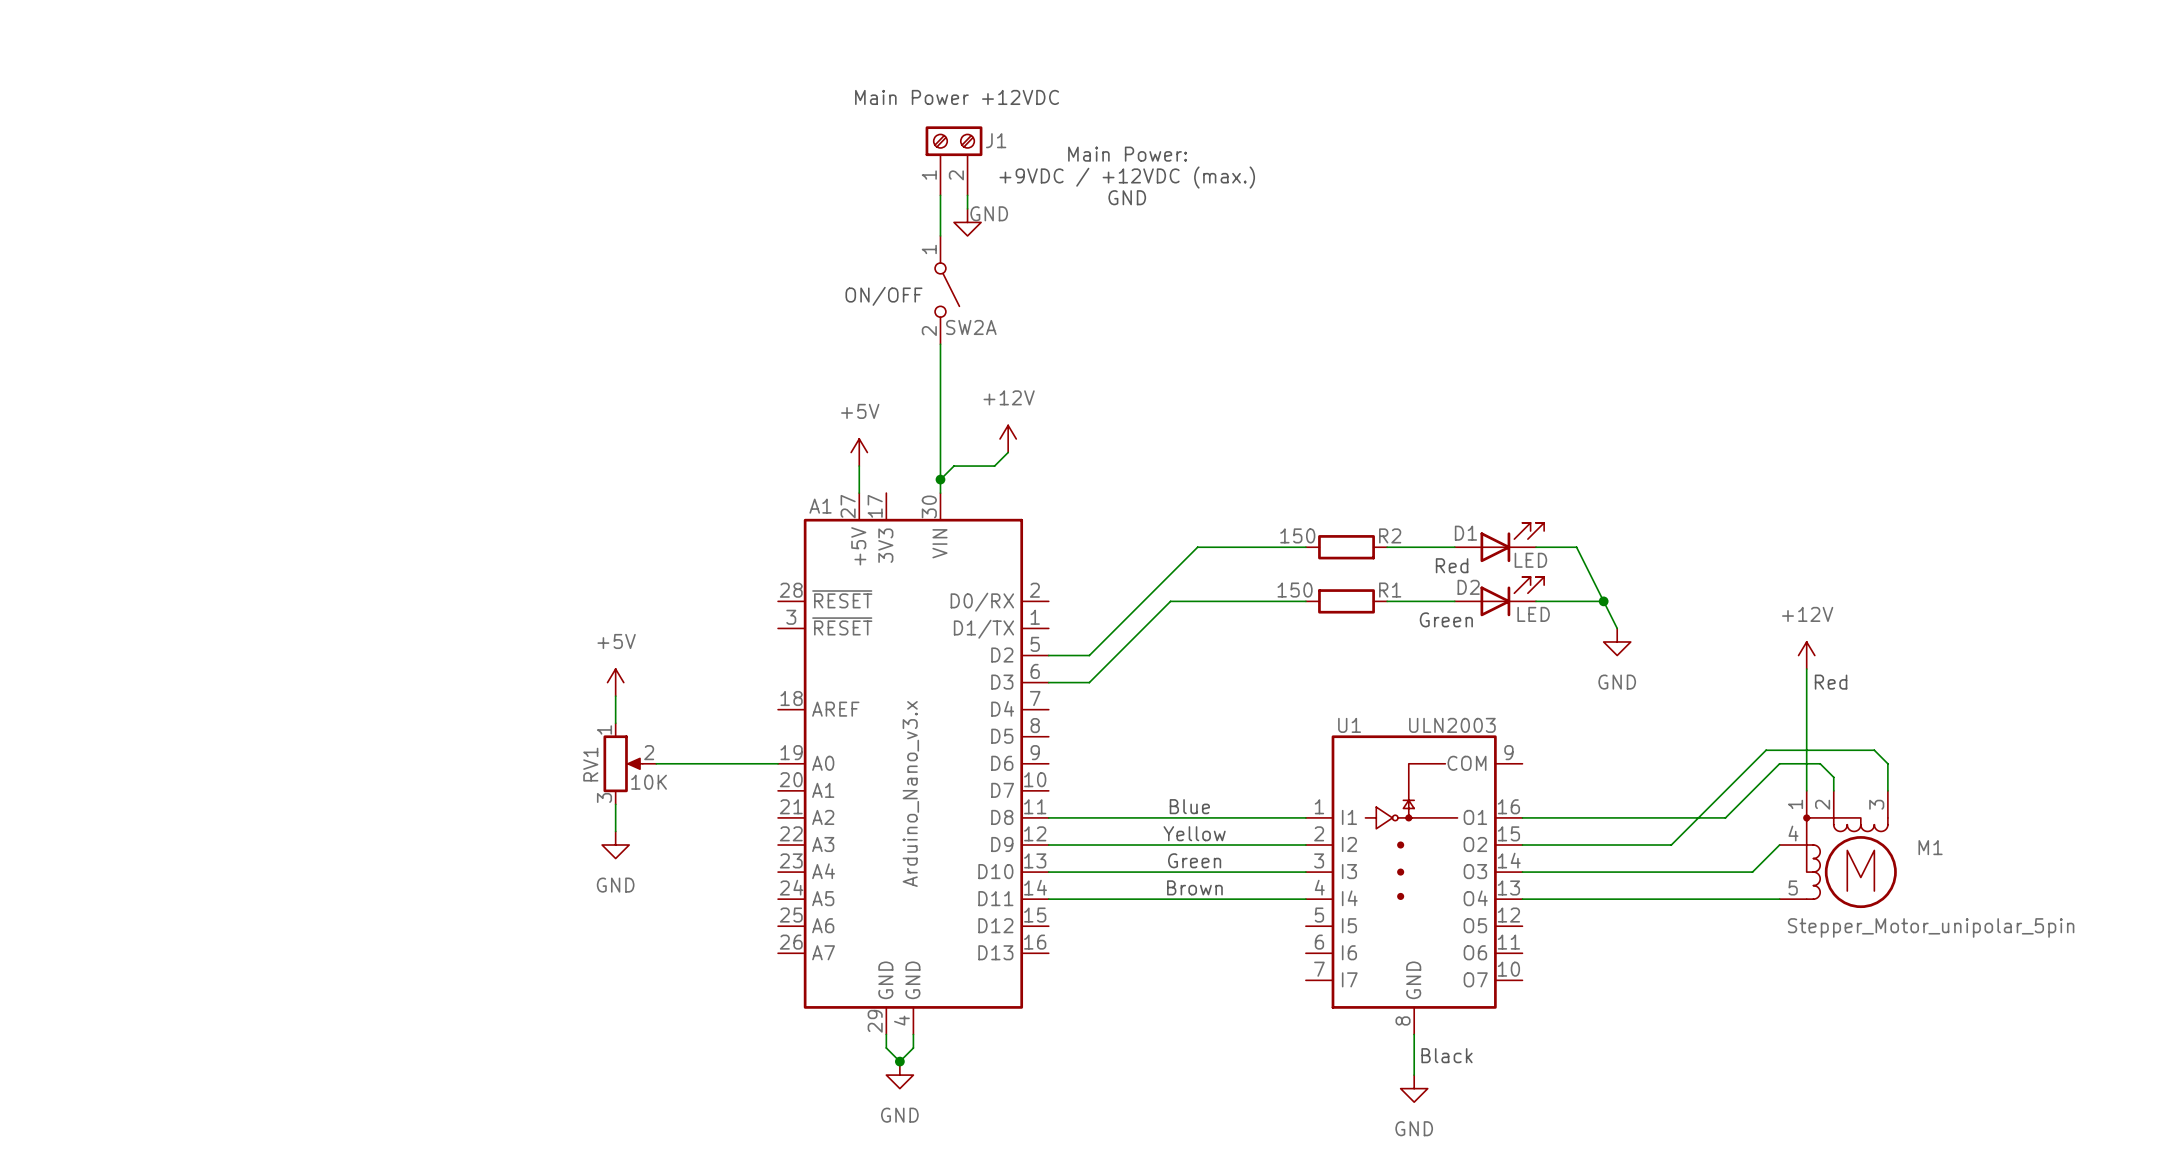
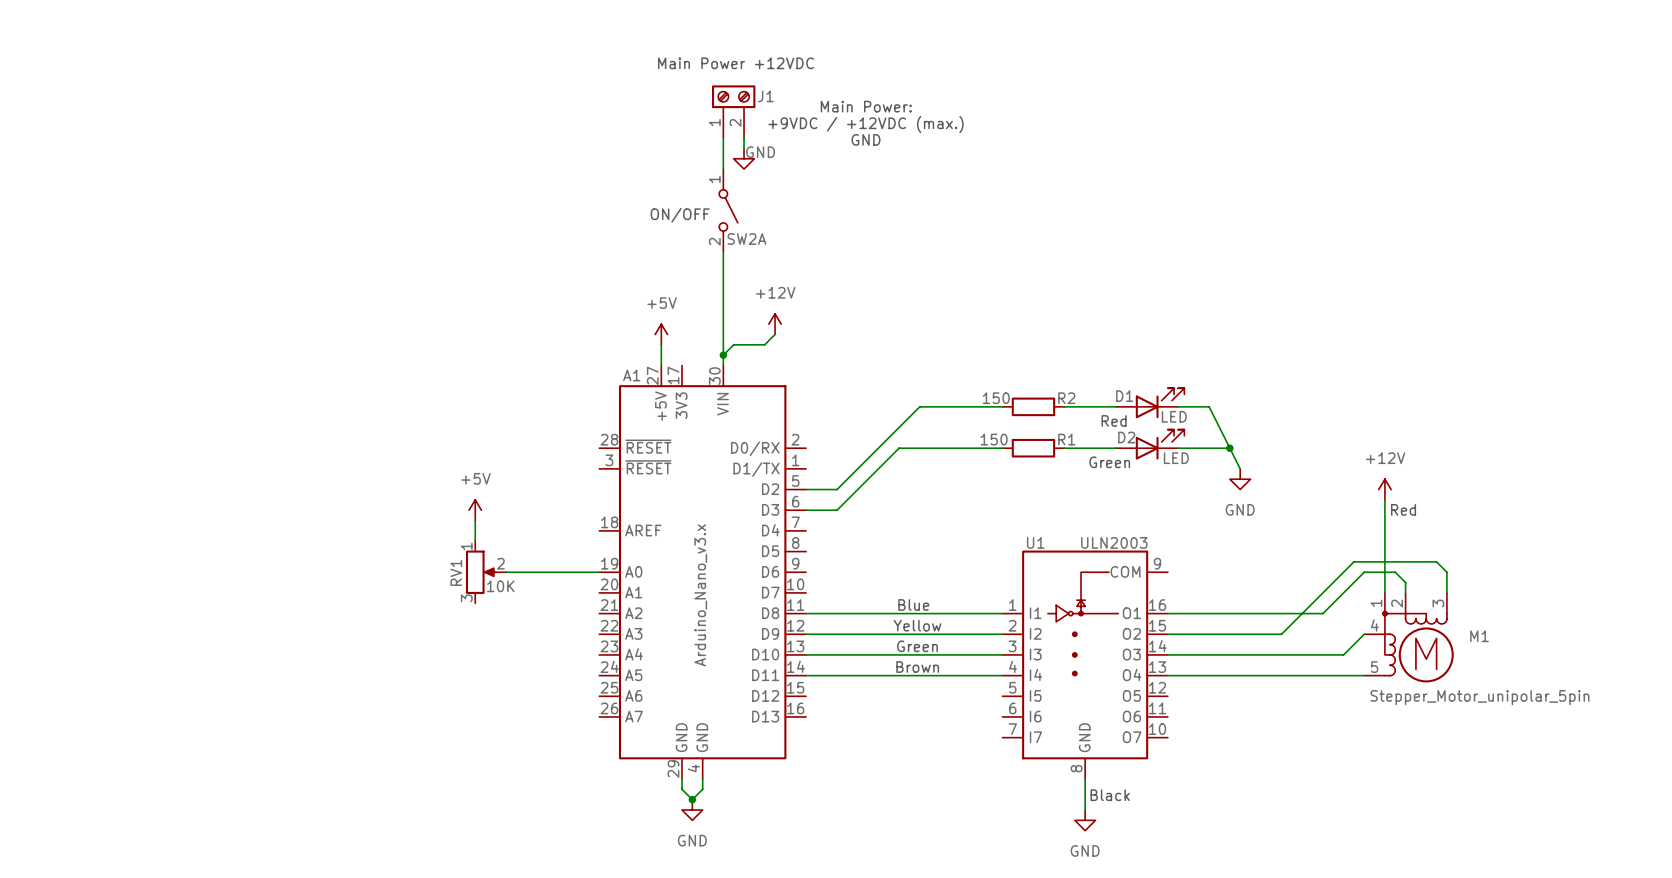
wire: (615, 804) (615, 831) -> none
power symbol: GND (615, 845) -> none

